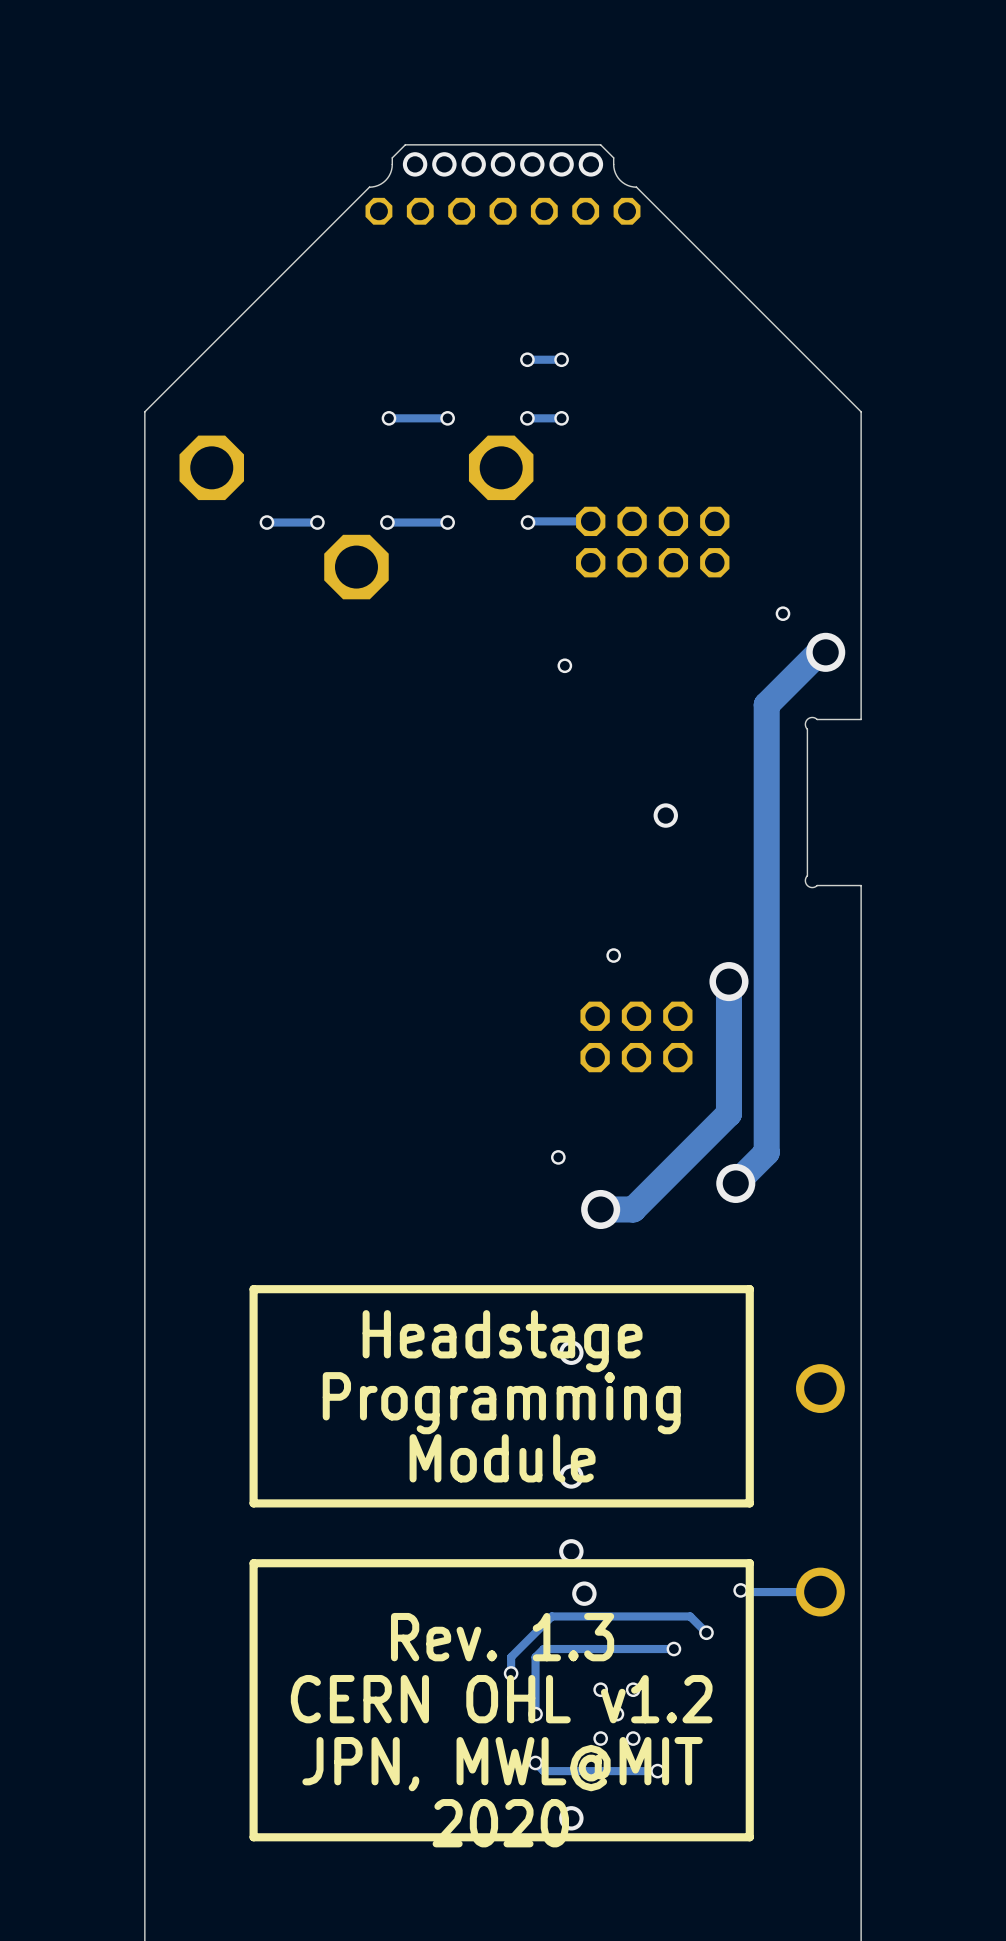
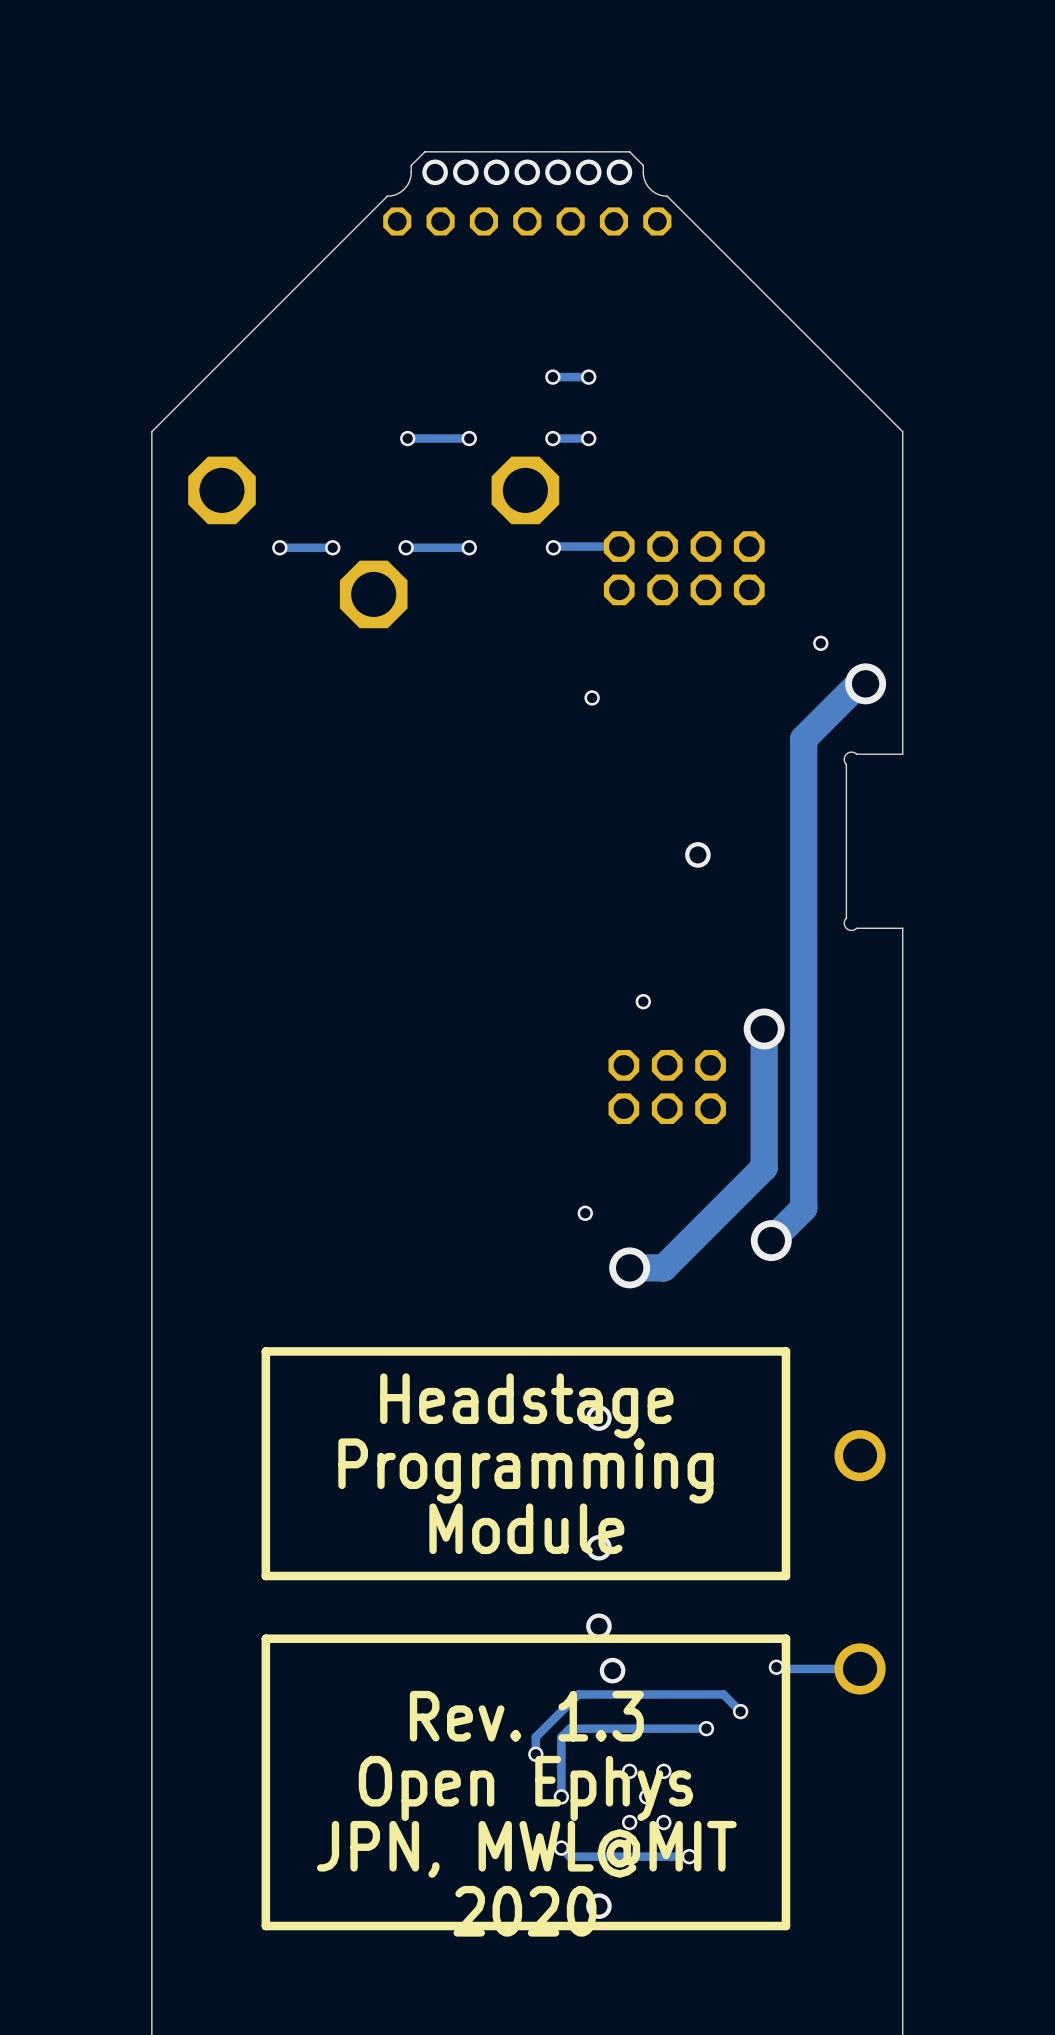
text: CERN OHL v1.2 (501, 1699) -> Open Ephys (525, 1788)

